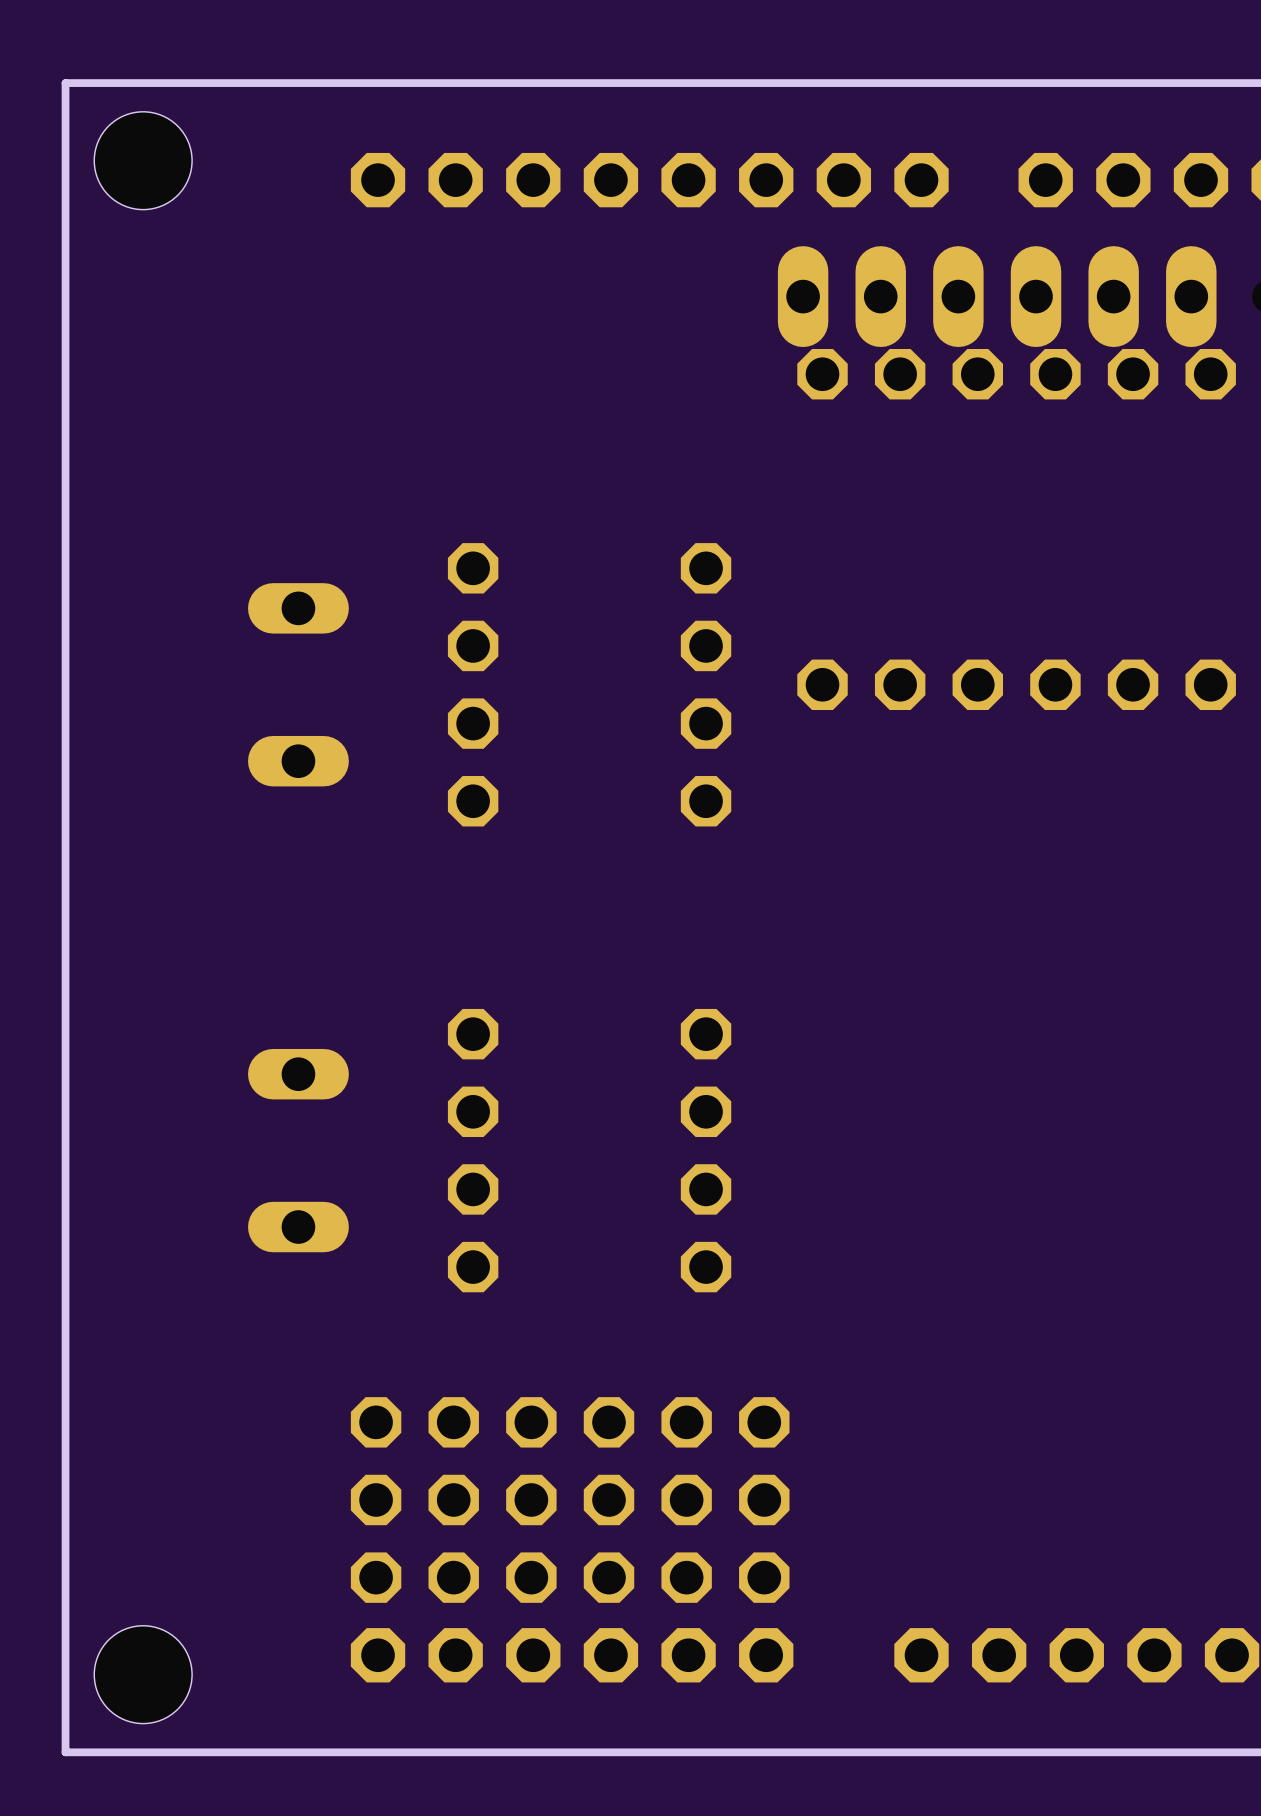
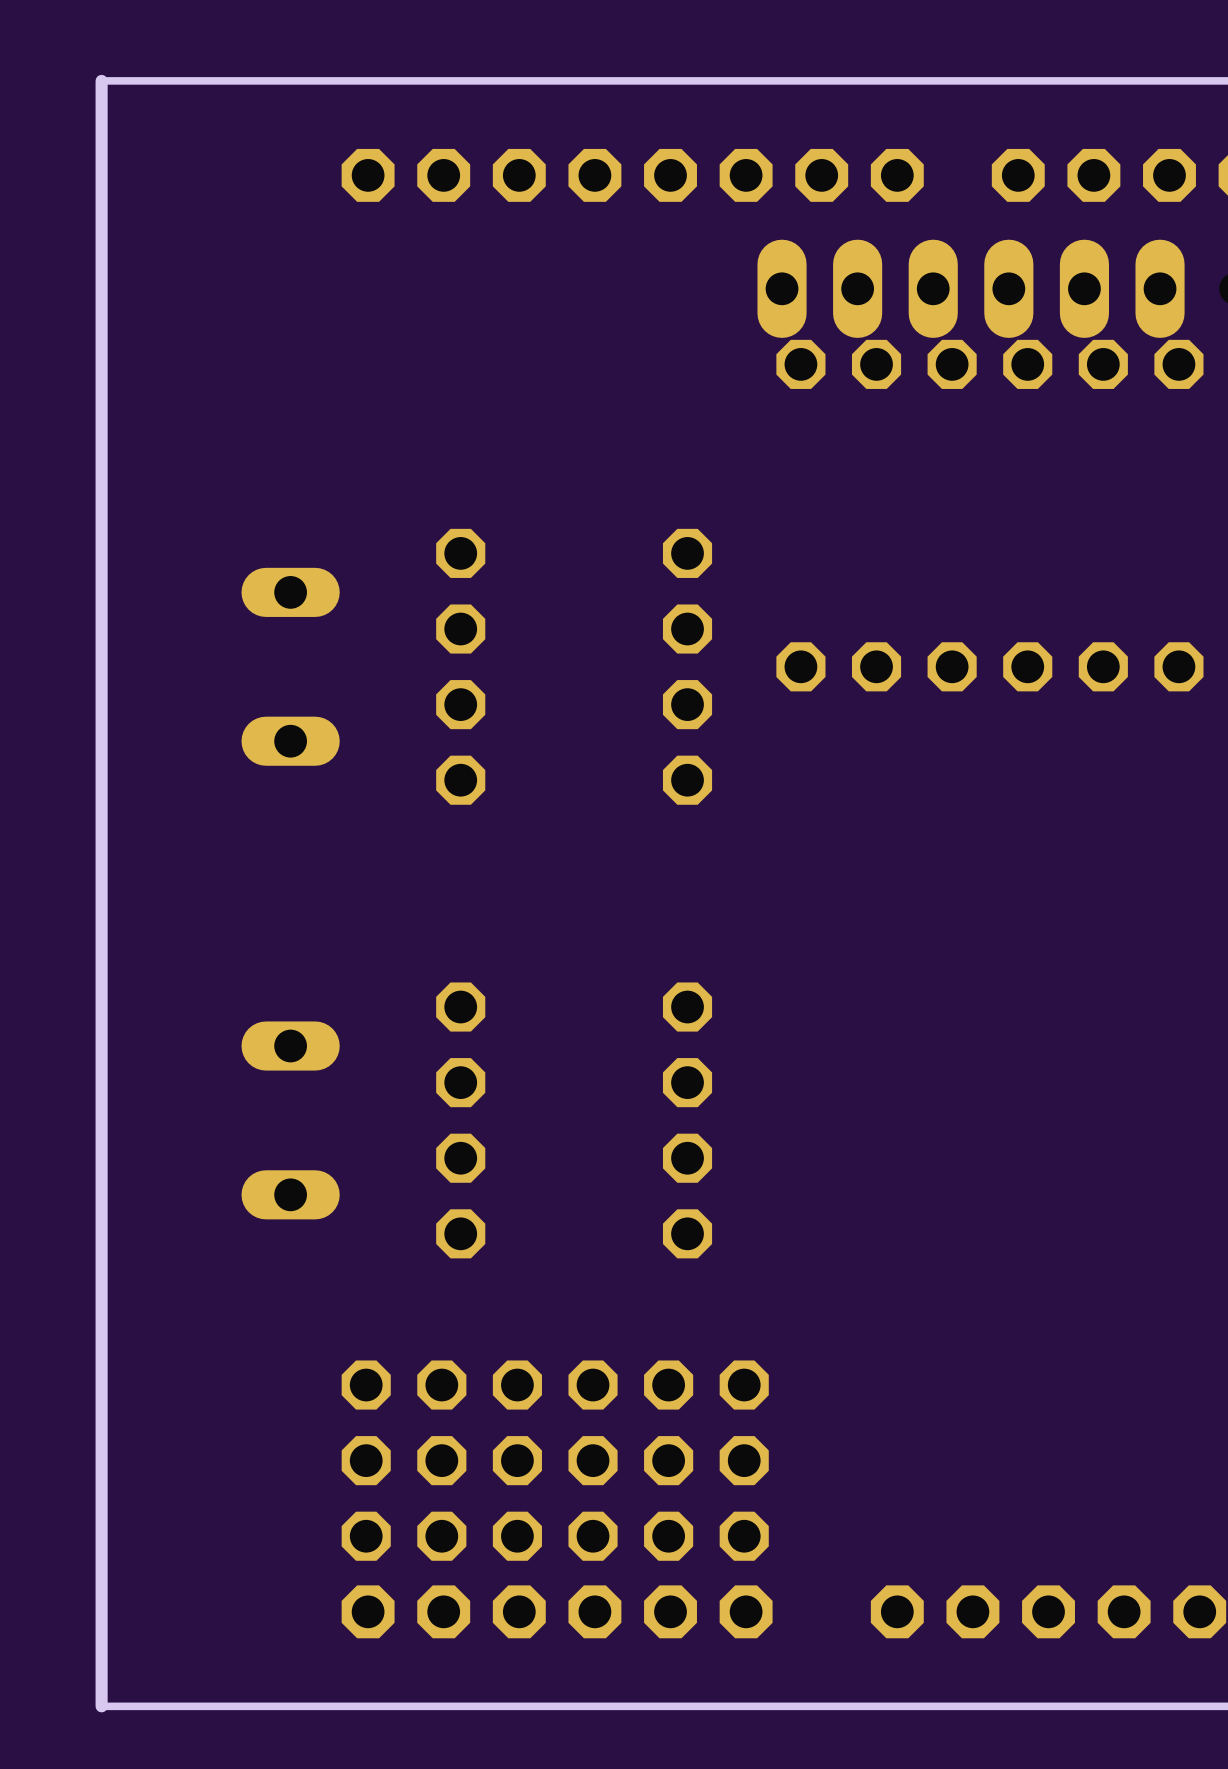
board edge: (104, 83) (65, 83) (65, 1752) (104, 1752) -> (101, 80) (101, 1706)
hole: (143, 160) -> none
hole: (143, 1674) -> none

